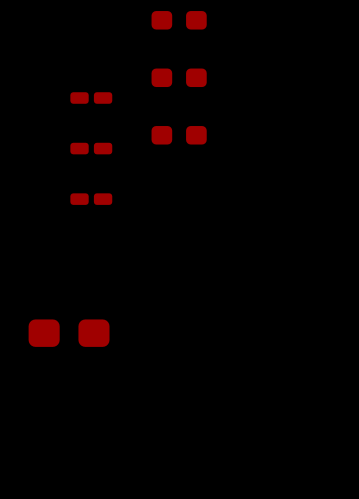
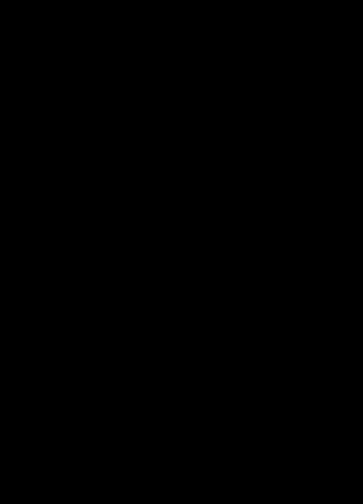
part: (179, 20) -> none
part: (179, 77) -> none
part: (91, 98) -> none
part: (179, 135) -> none
part: (91, 148) -> none
part: (91, 199) -> none
part: (69, 333) -> none

